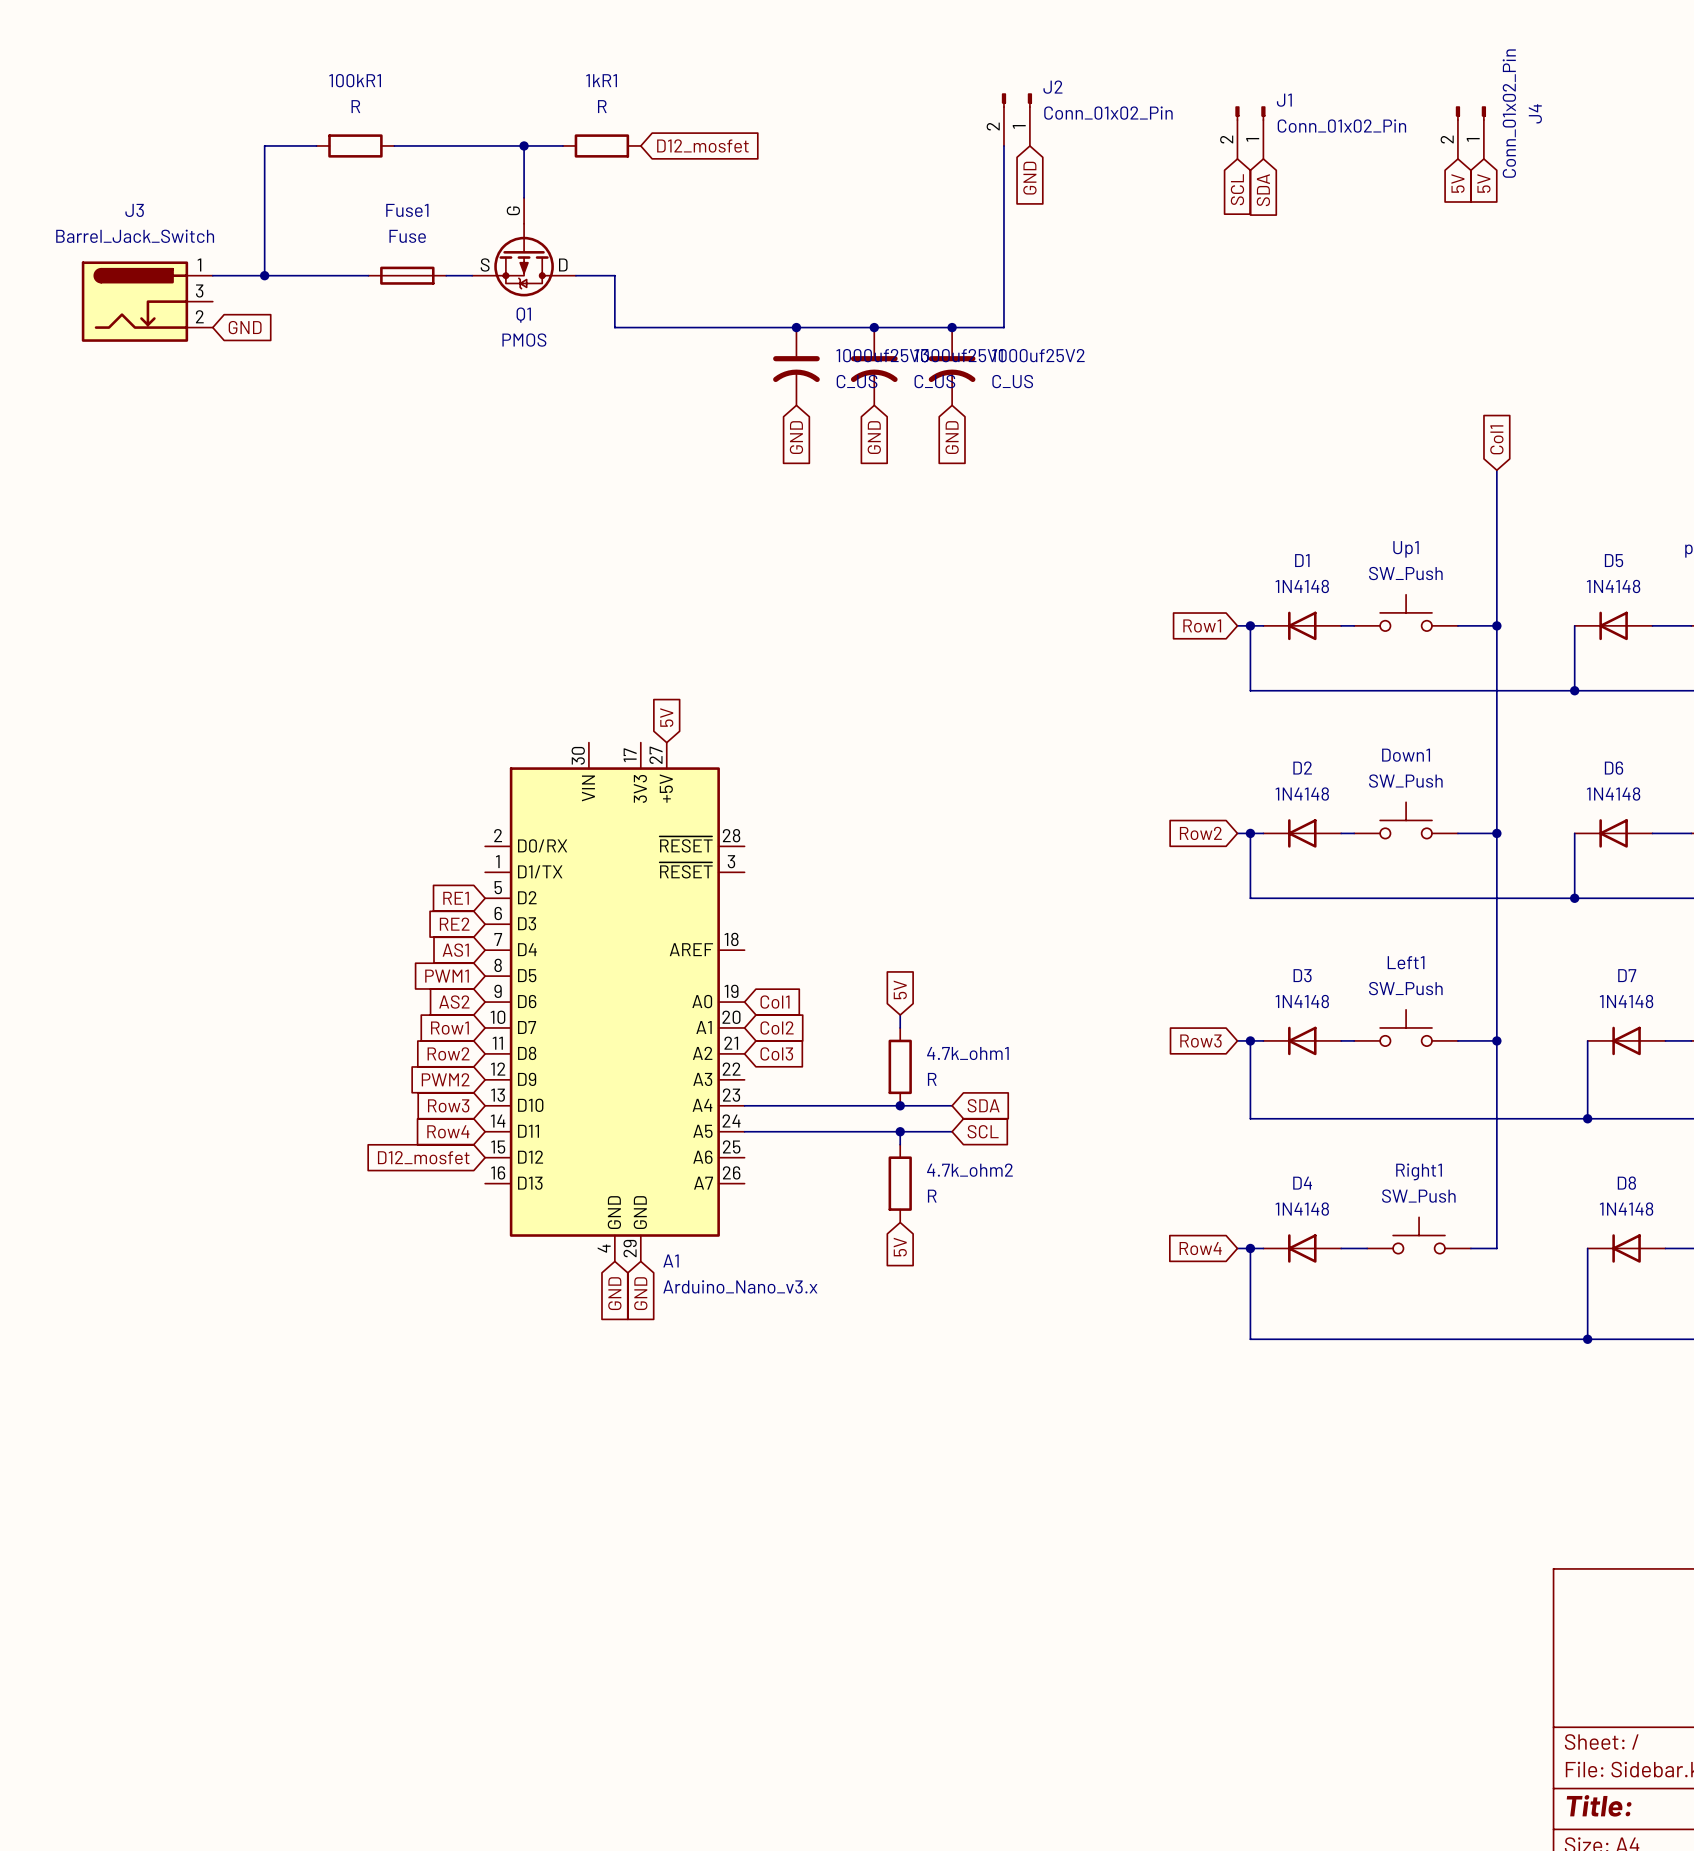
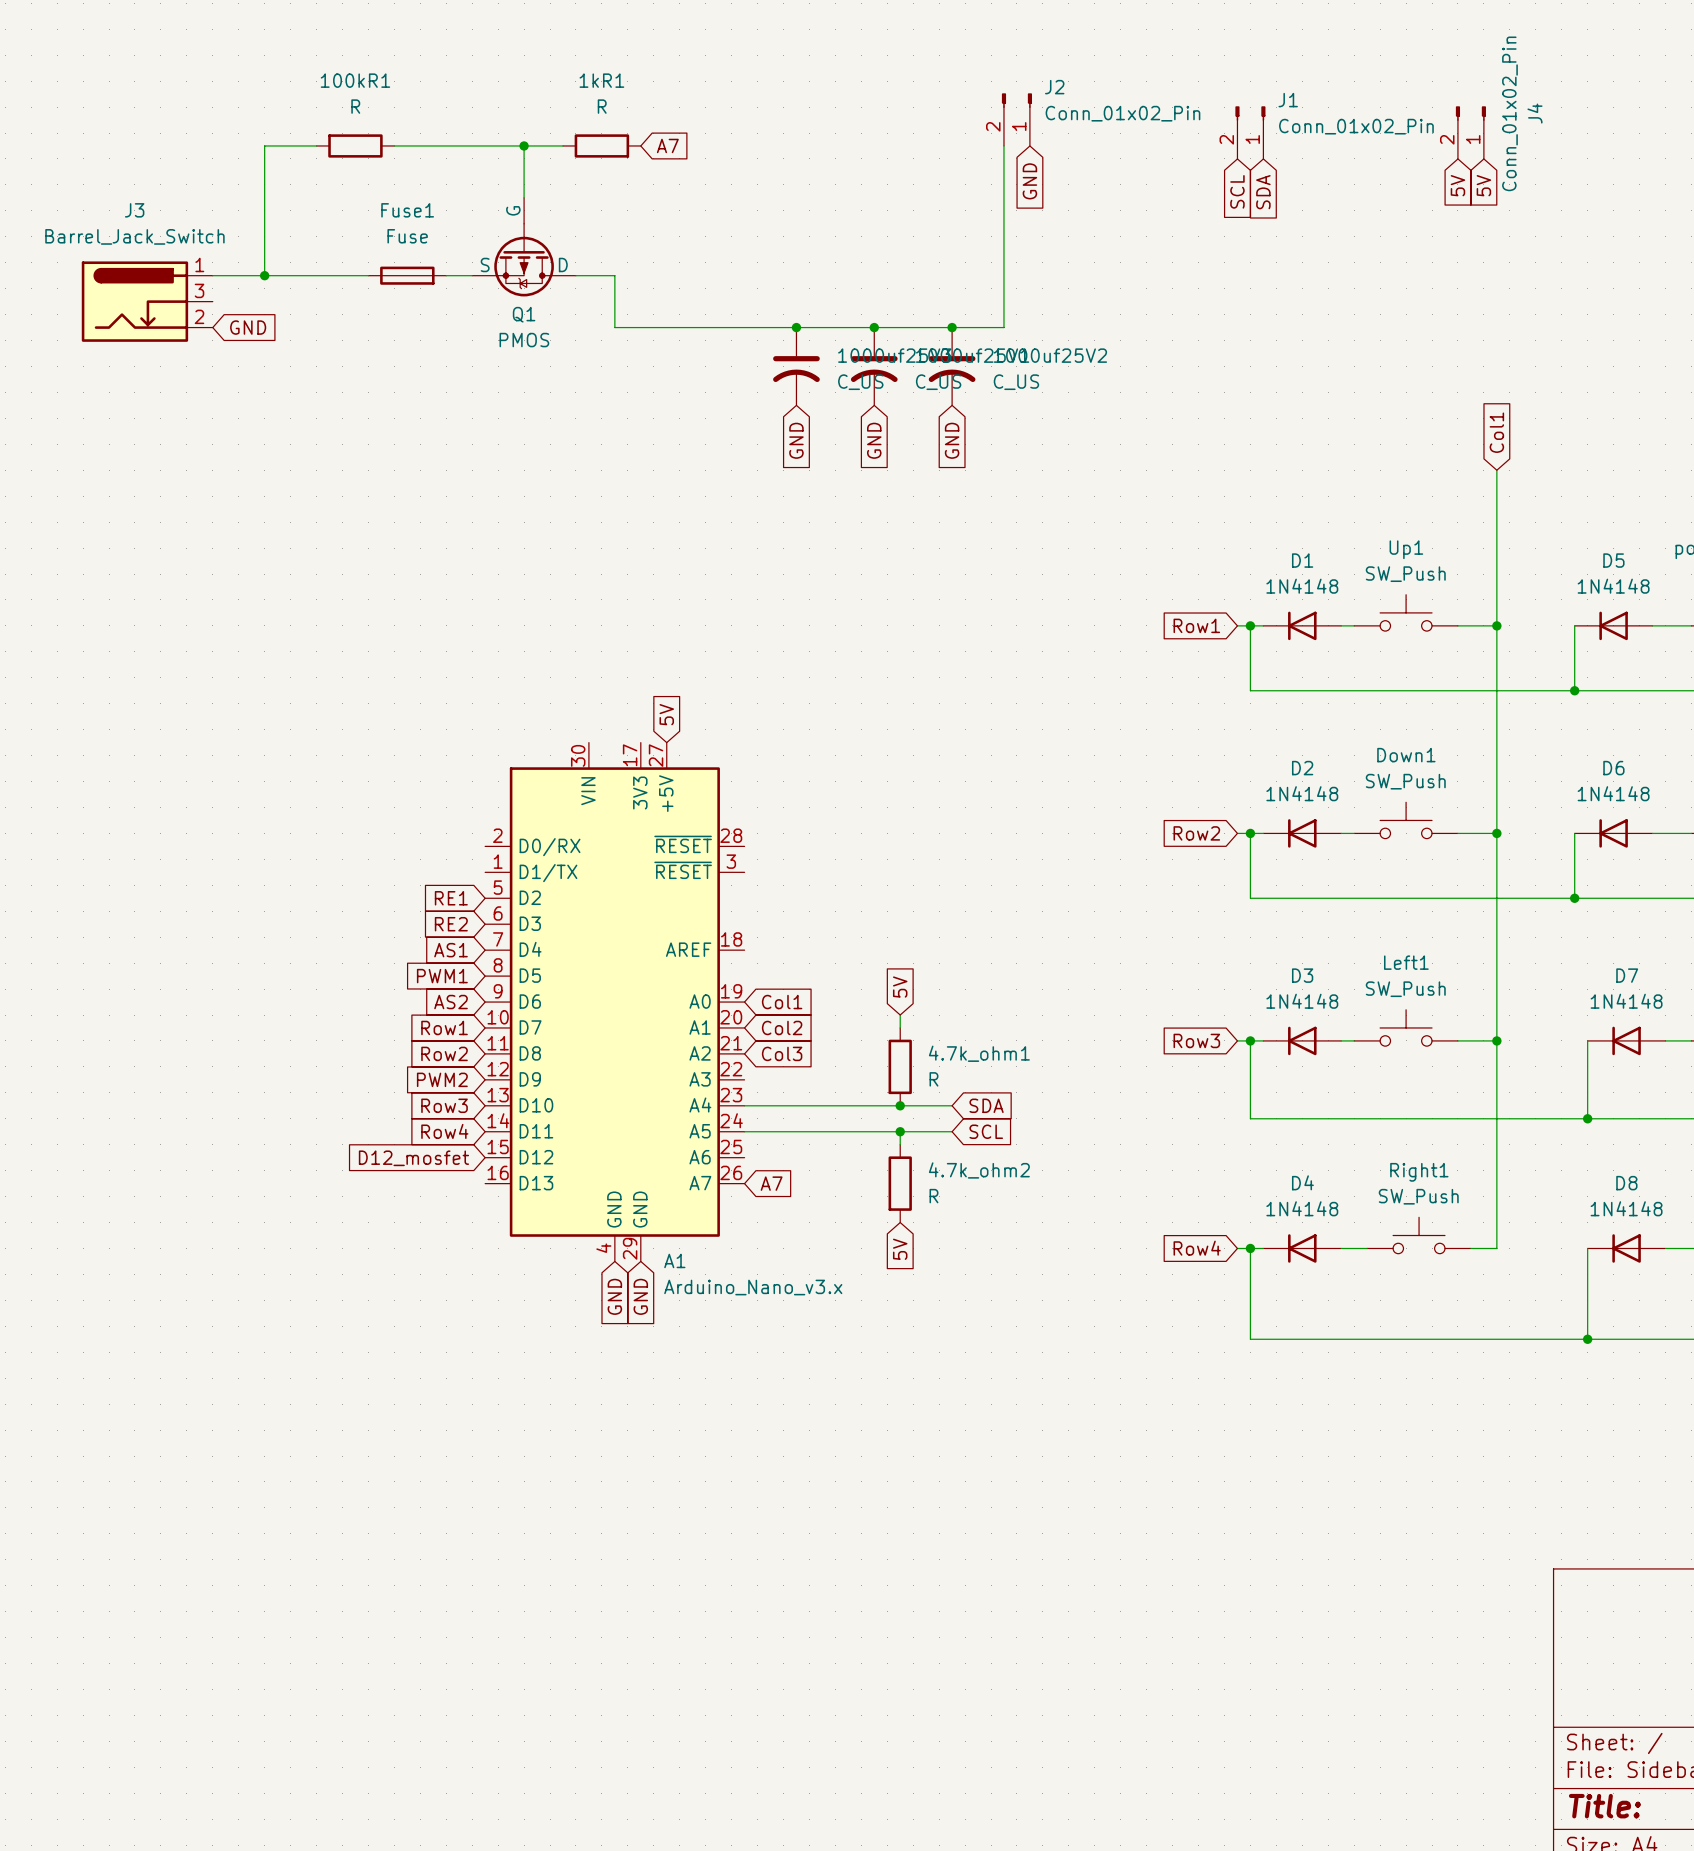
global label: D12_mosfet (702, 145) -> A7 (667, 145)
global label: none -> A7 (771, 1183)

